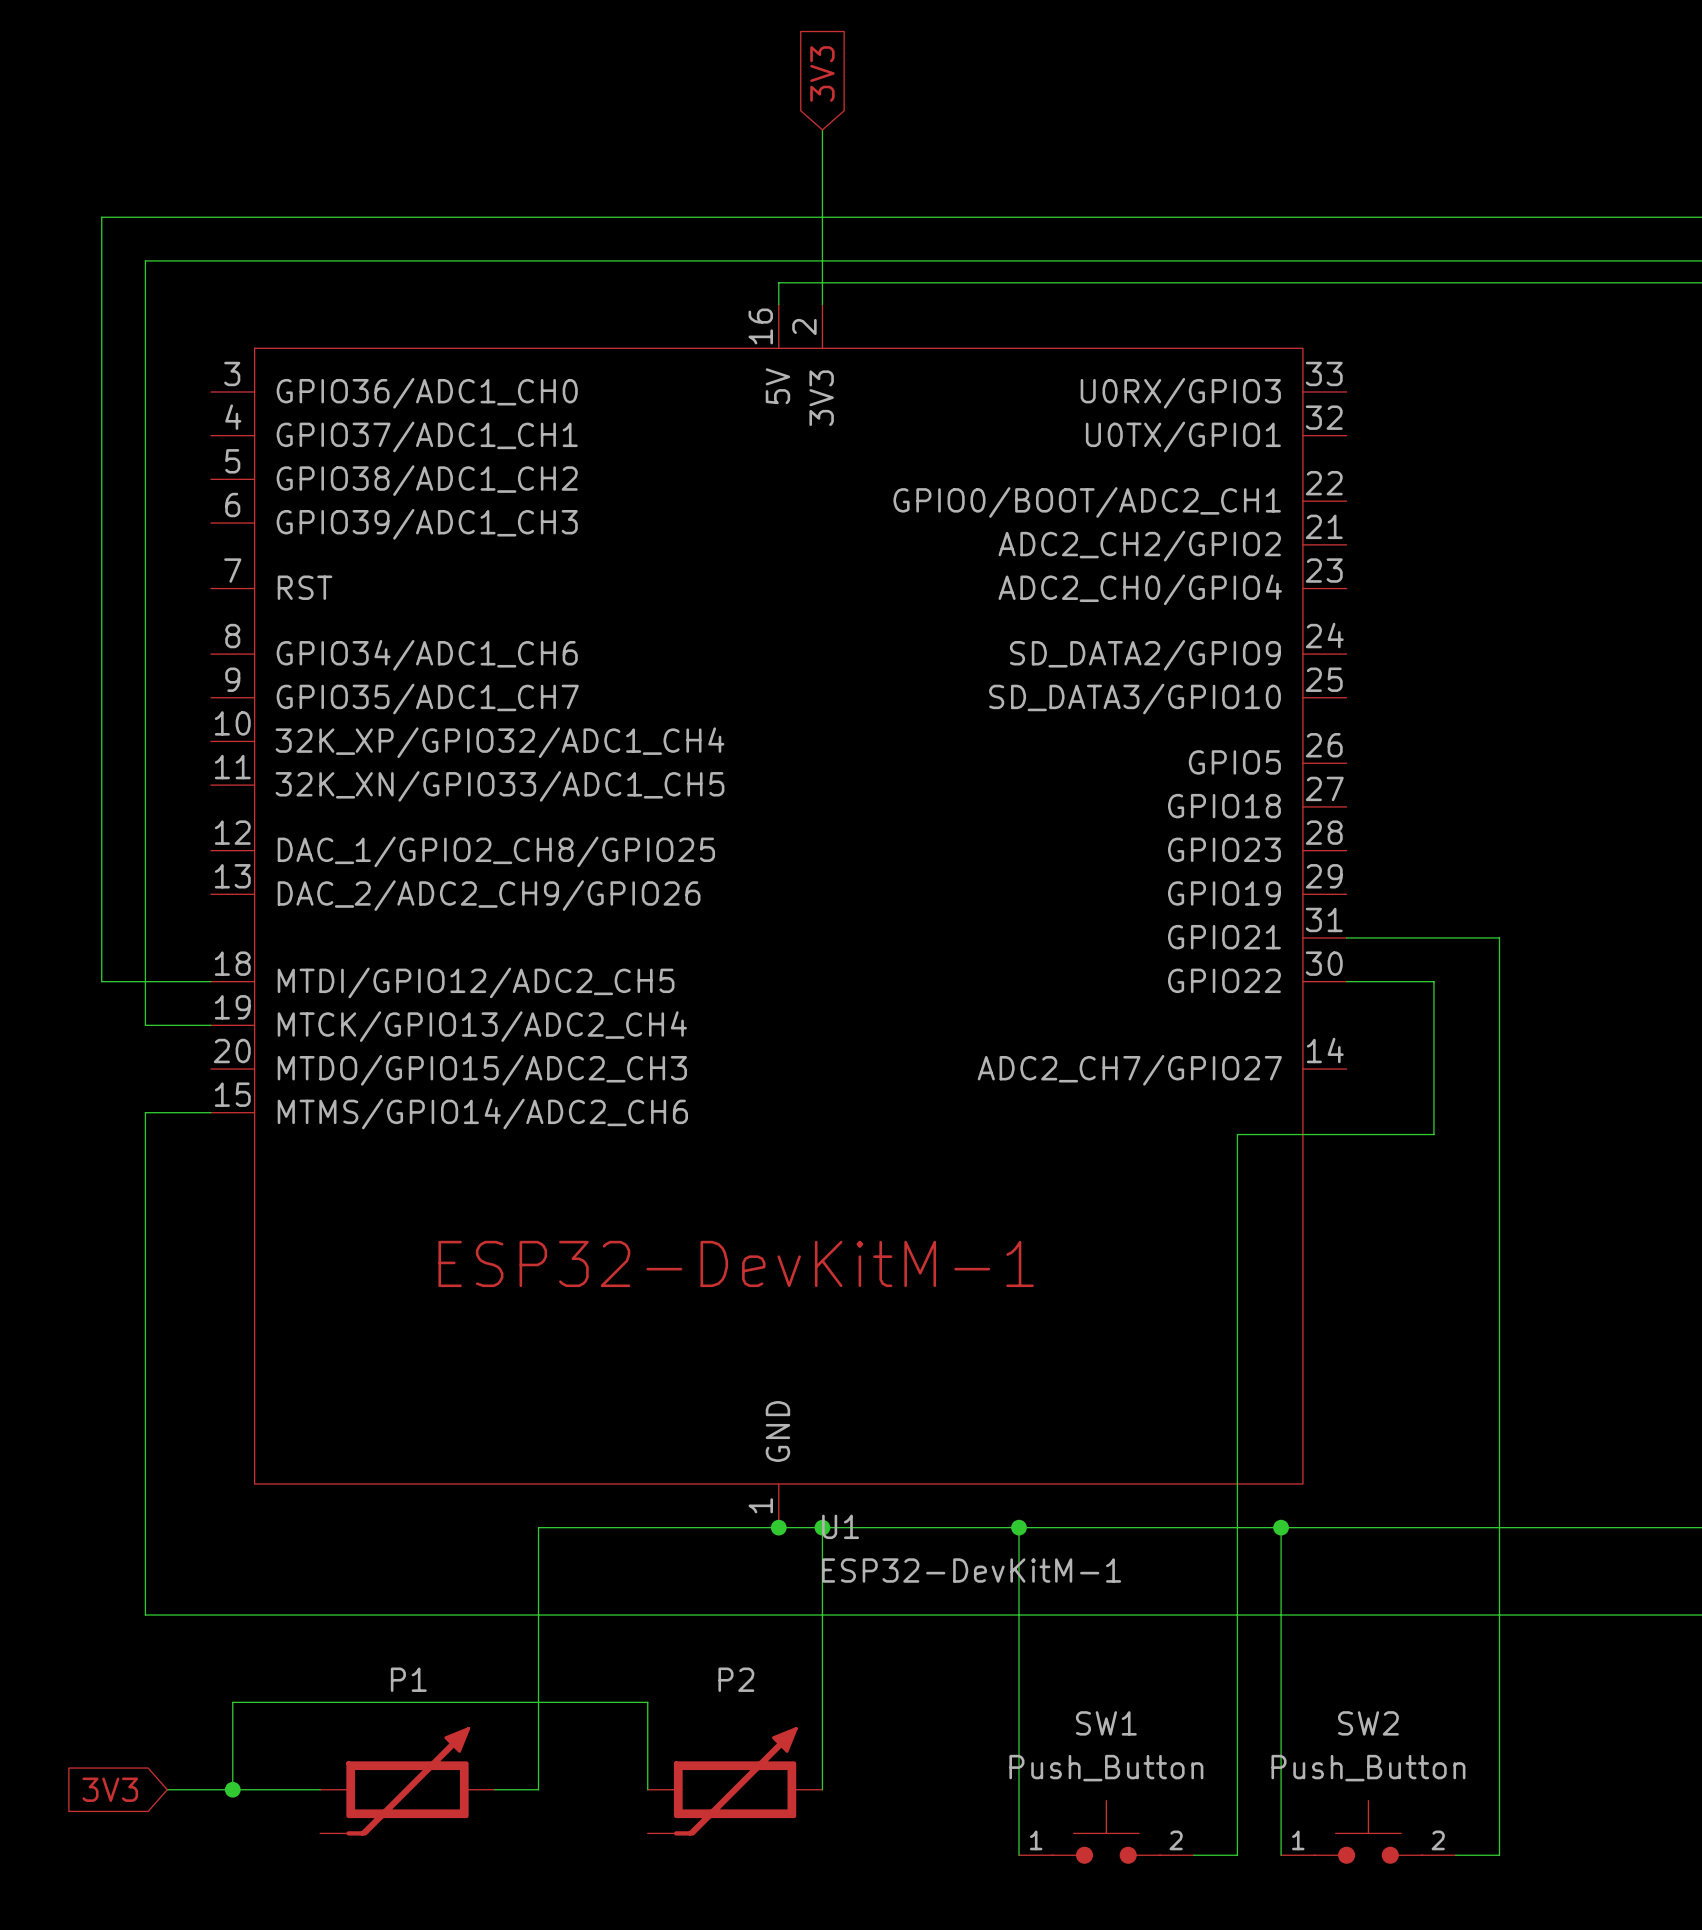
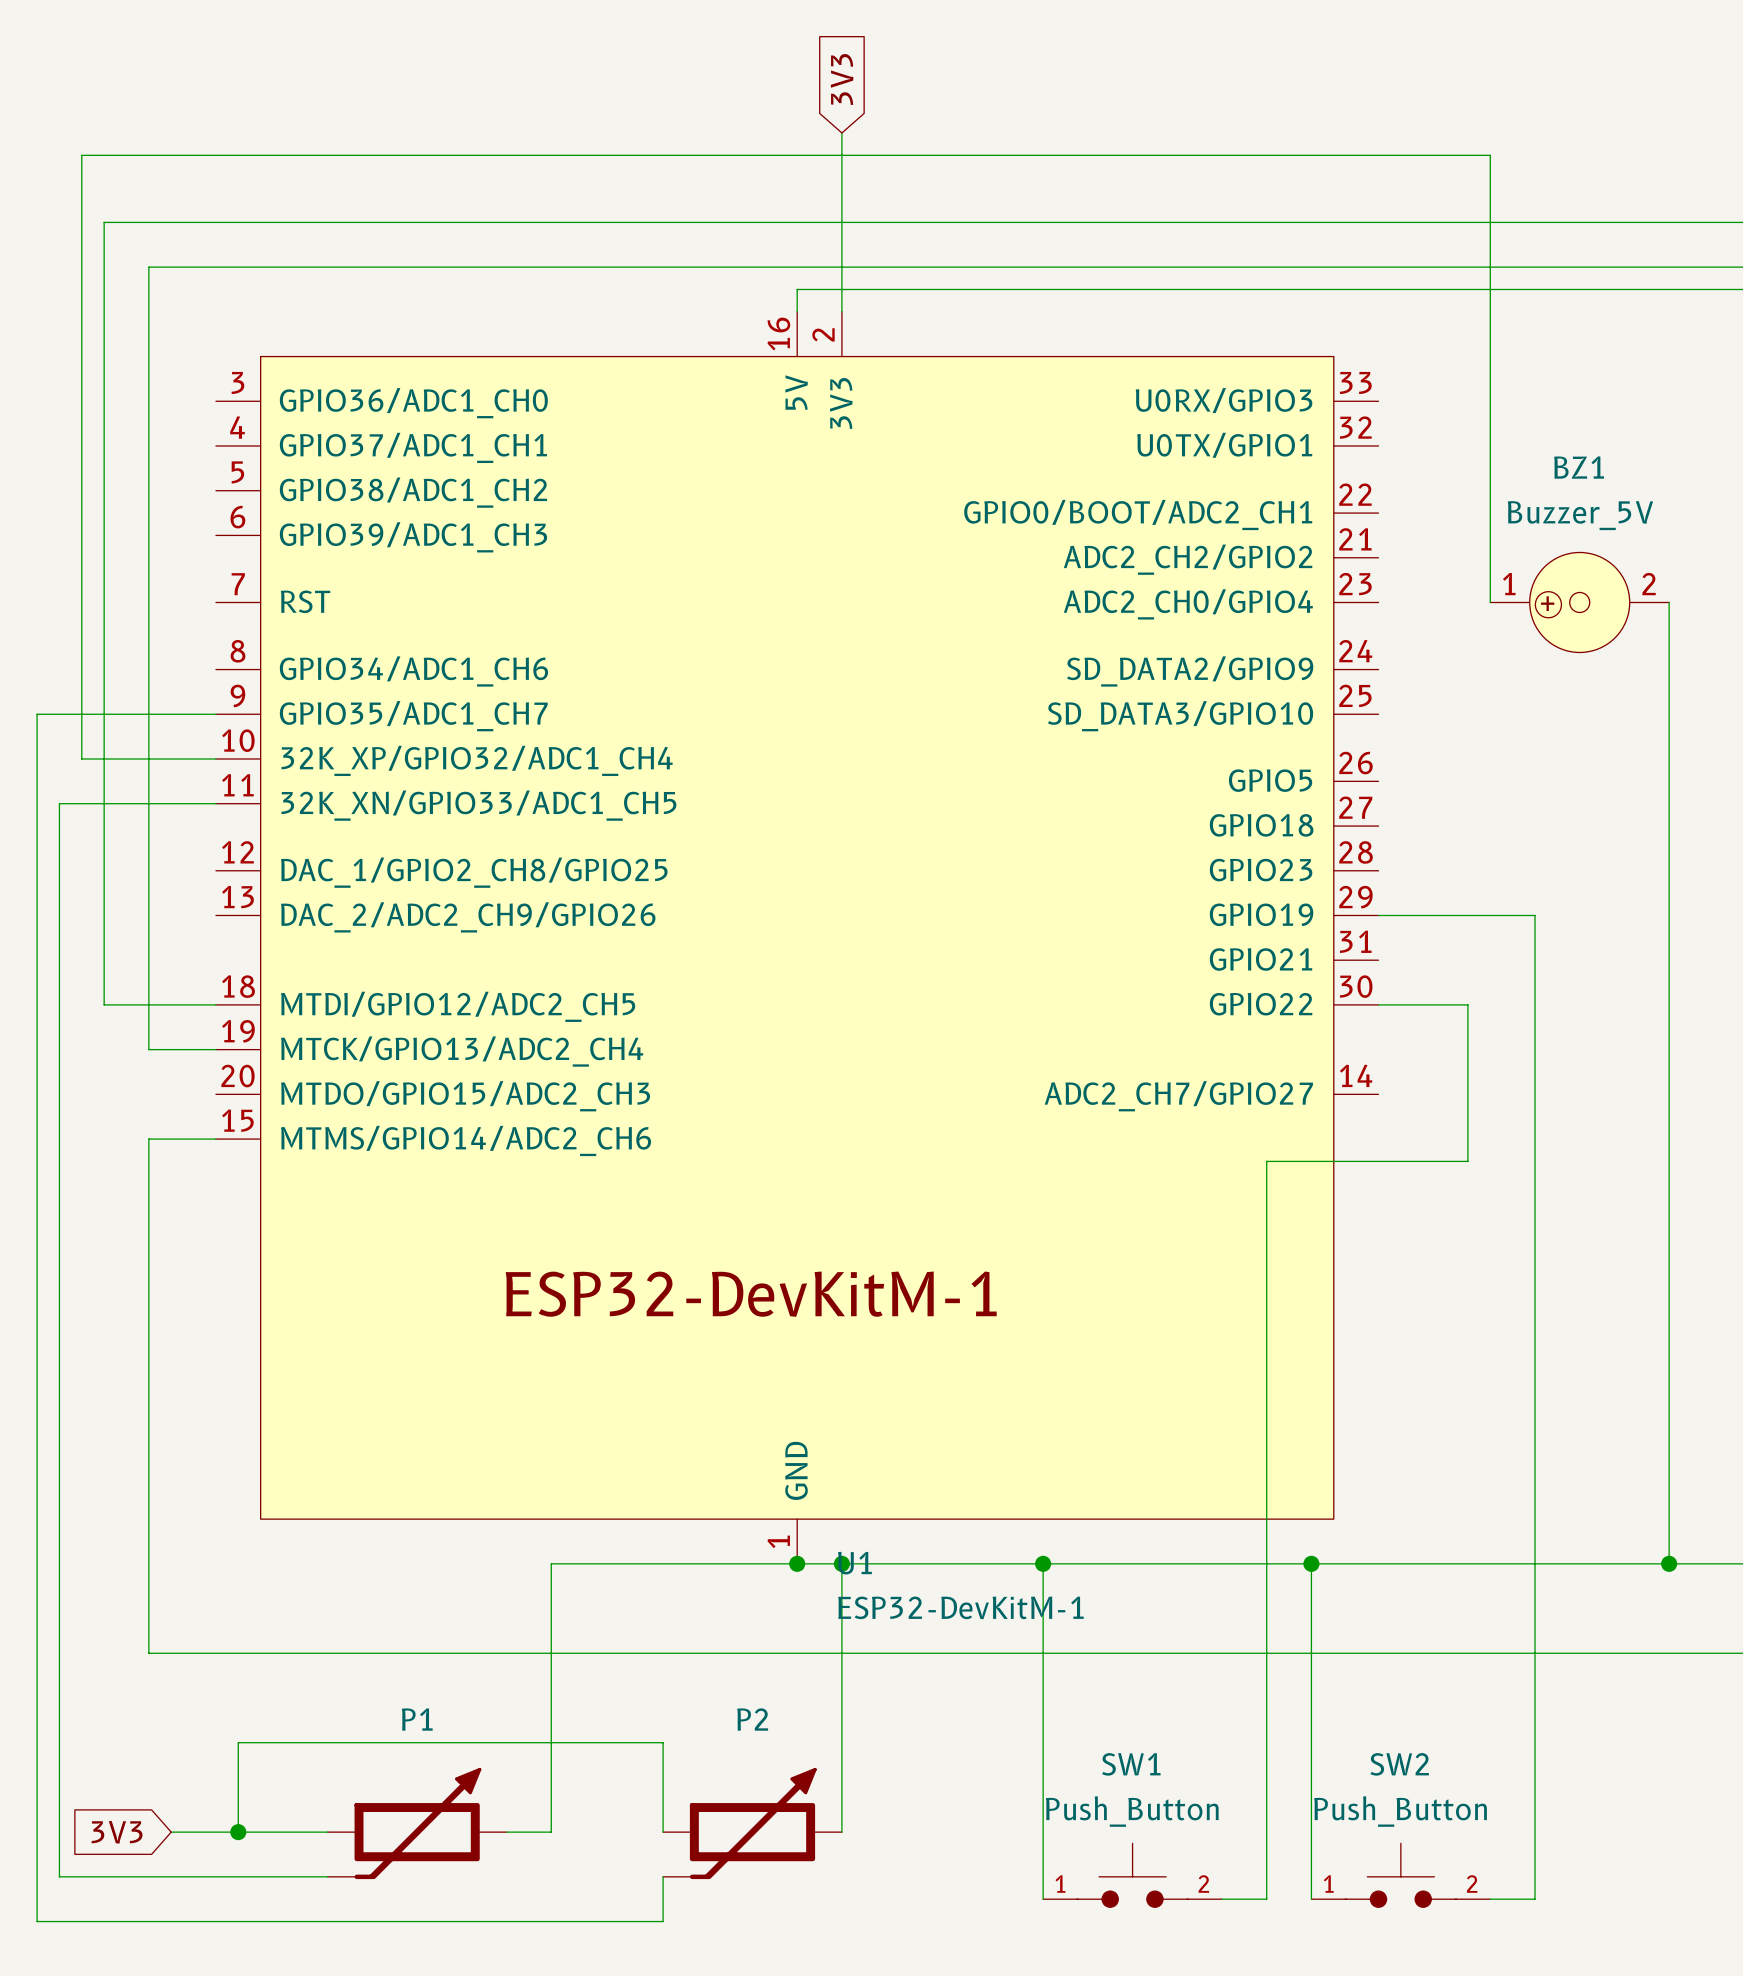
wire: none -> (1490, 602) (1490, 155) (81, 155) (81, 758) (215, 758)
BZ1: none -> Buzzer_5V (1579, 602)
wire: none -> (1669, 602) (1669, 1563)
wire: none -> (215, 714) (37, 714) (37, 1921) (663, 1921) (663, 1876)
wire: none -> (215, 803) (59, 803) (59, 1876) (327, 1876)
wire: (1346, 937) (1499, 937) -> (1378, 915) (1534, 915) (1534, 960)
junction: none -> (1669, 1563)

